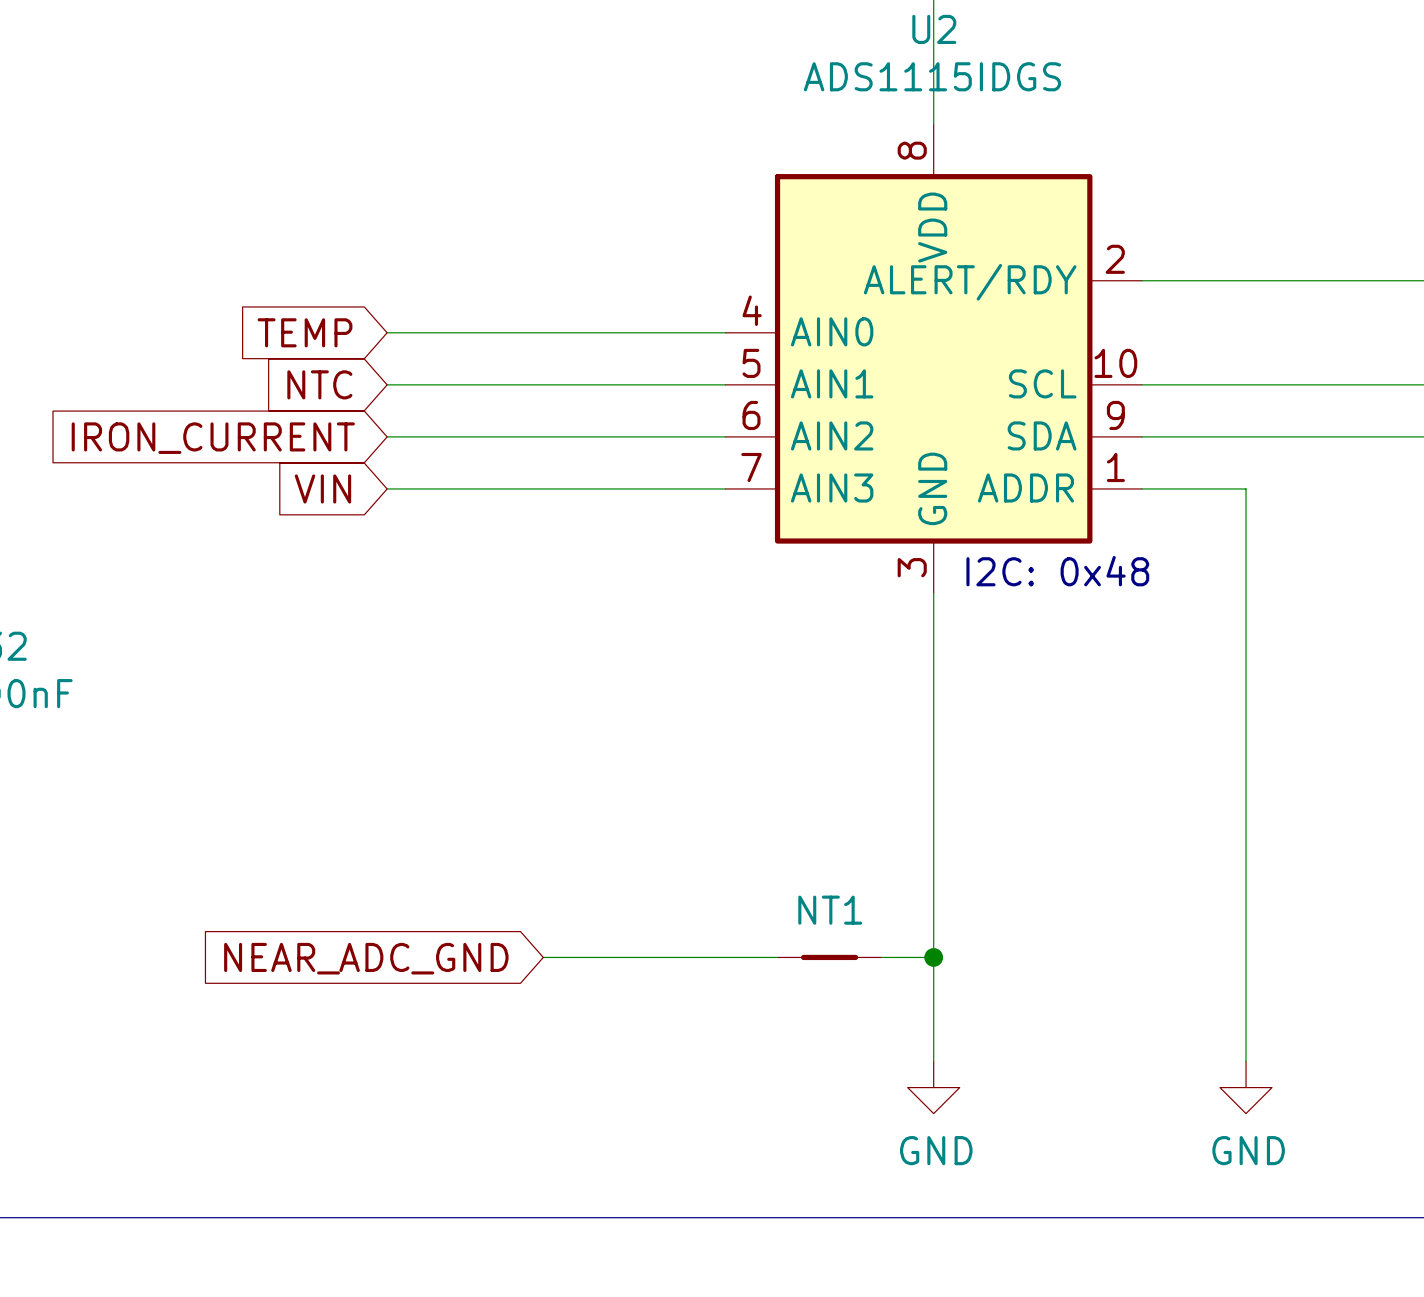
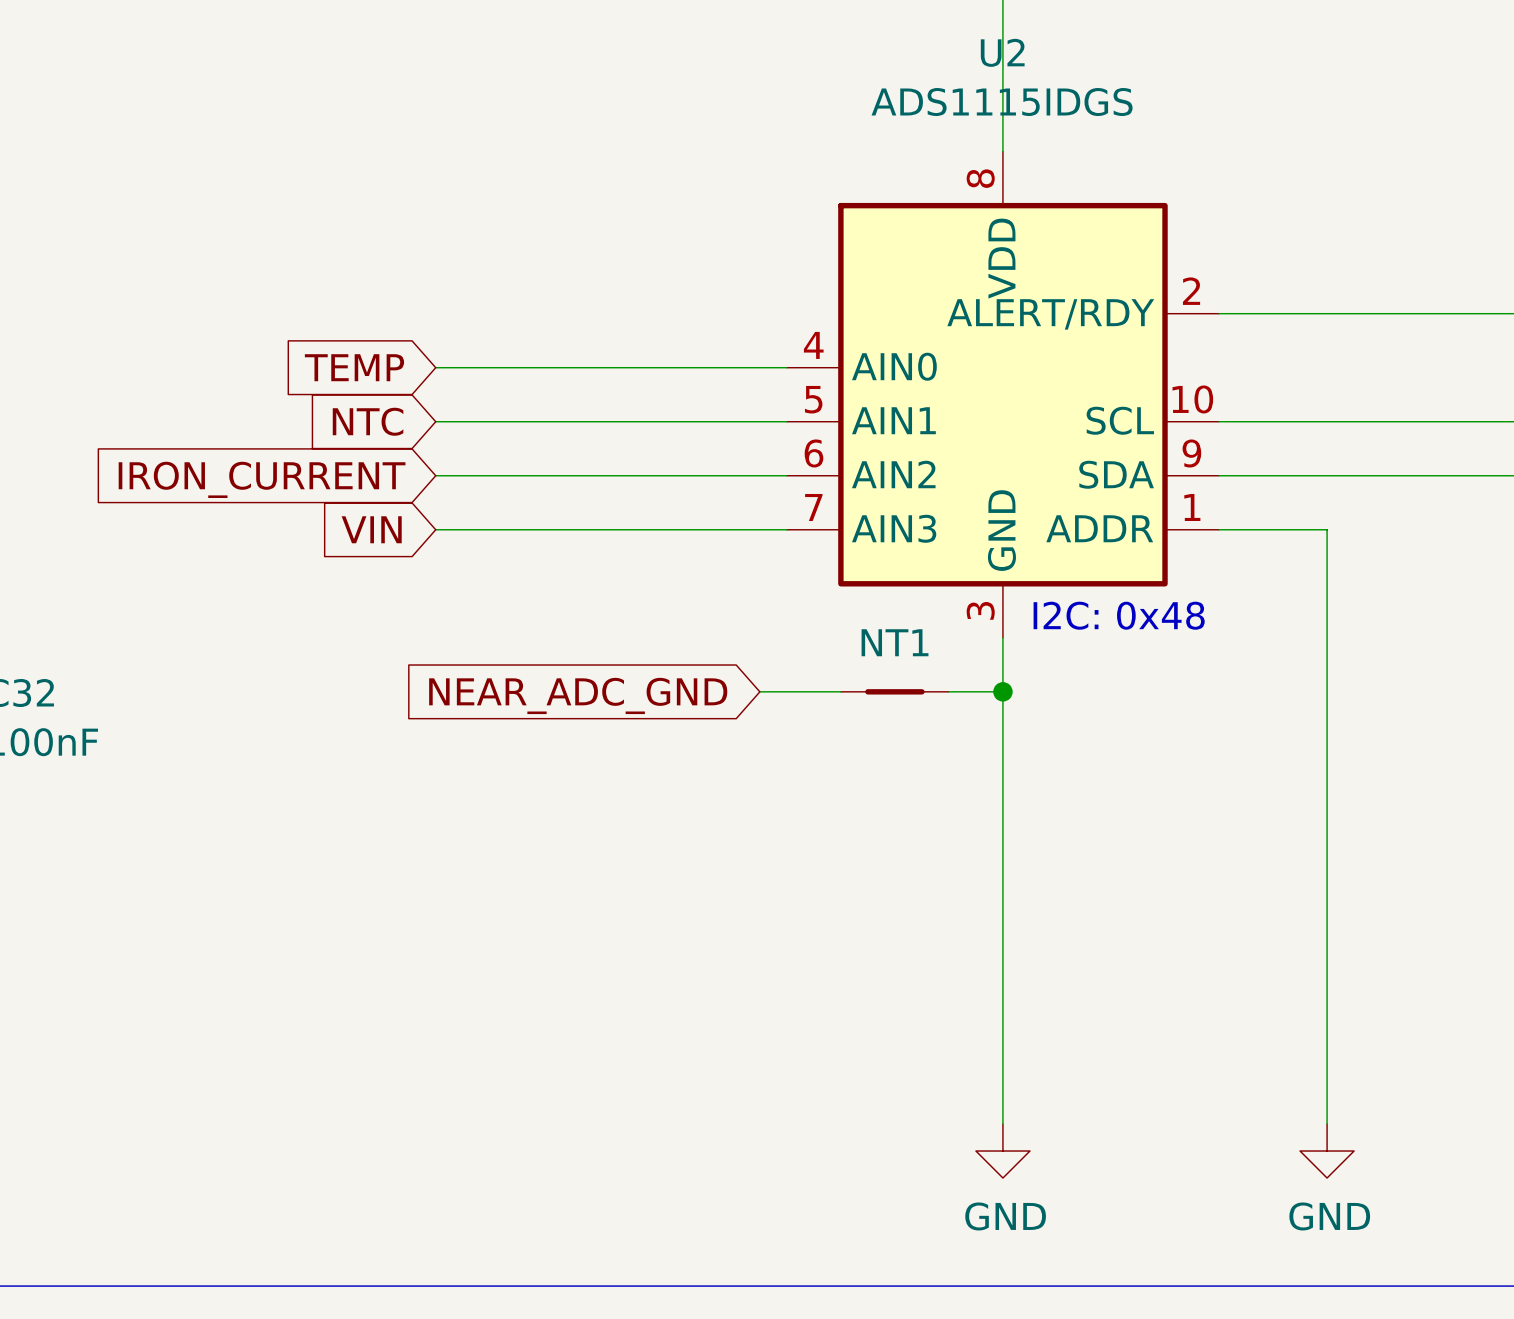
wire: none -> (759, 691) (840, 691)
junction: none -> (1002, 691)
wire: (543, 957) (777, 957) -> none
NT1 position: (829, 957) -> (894, 691)
wire: (881, 957) (933, 957) -> (948, 691) (1002, 691)
junction: (933, 957) -> none
global label position: NEAR_ADC_GND (366, 958) -> NEAR_ADC_GND (578, 695)

